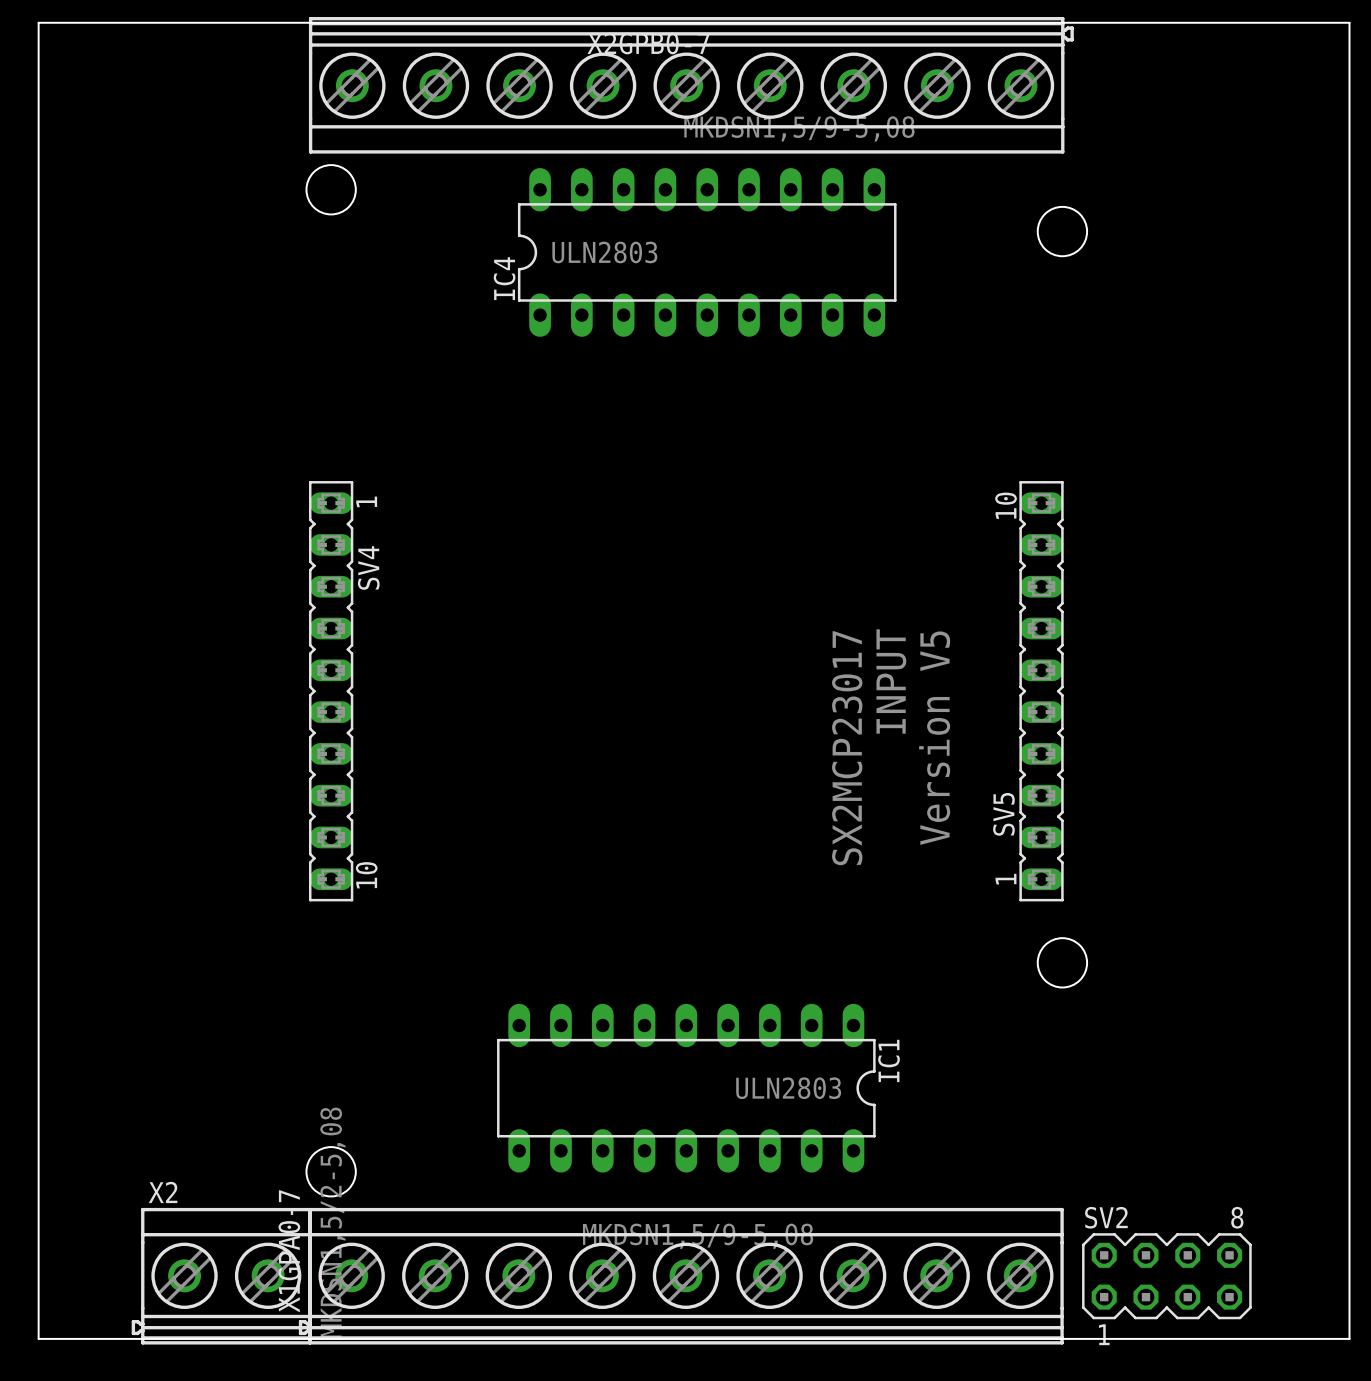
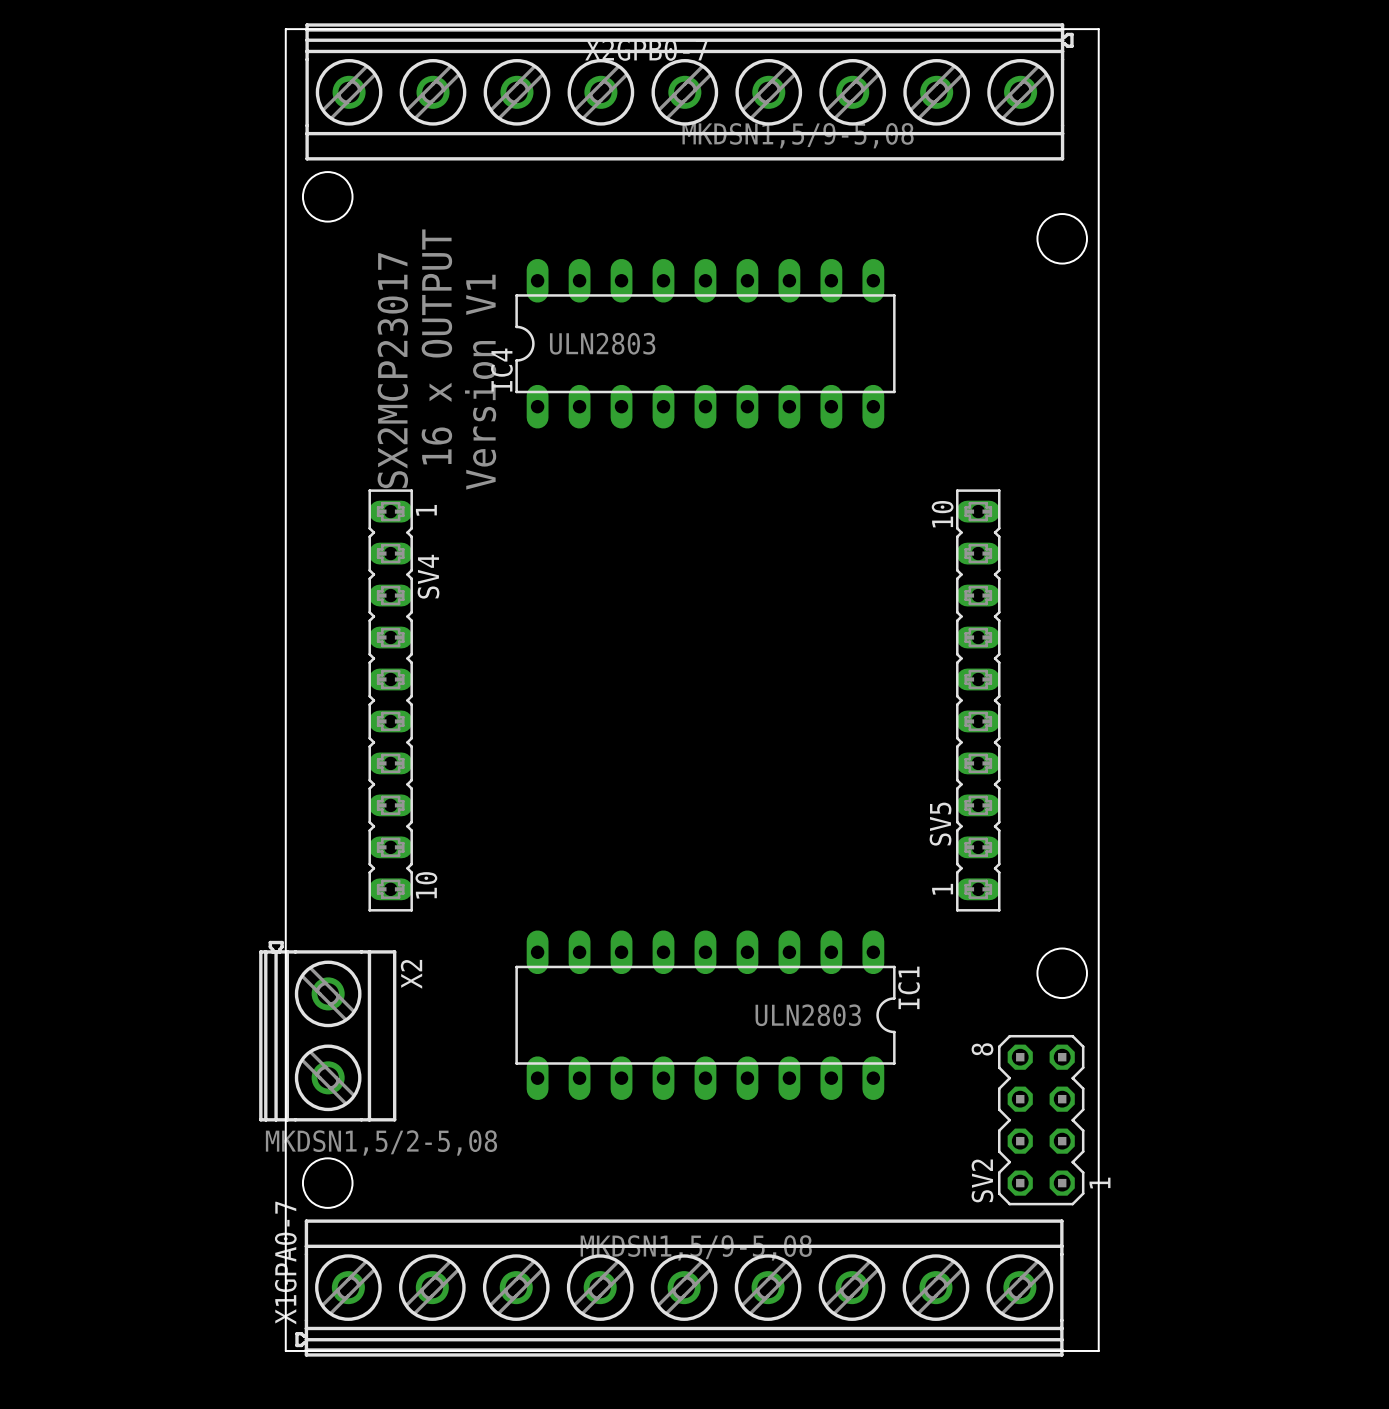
board edge: (289, 22) (38, 22) (38, 1338) (289, 1338) -> (285, 29) (285, 1350)
board edge: (1098, 22) (1349, 22) (1349, 1338) (1098, 1338) -> (1098, 29) (1098, 1350)
IC4 position: (707, 252) -> (705, 343)
text: none -> 16 x OUTPUT (436, 346)
text: none -> SX2MCP23017 (392, 370)
text: none -> Version V1 (480, 382)
text: INPUT (891, 681) -> none
SV4 position: (331, 691) -> (390, 700)
SV5 position: (1041, 691) -> (978, 700)
text: Version V5 (934, 738) -> none
text: SX2MCP23017 (847, 748) -> none
IC1 position: (686, 1088) -> (705, 1015)
X2 rotation: 0° (221, 1276) -> 90° clockwise (327, 1031)
X2 position: (221, 1276) -> (327, 1031)
SV2 rotation: 0° (1166, 1276) -> 90° counterclockwise (1041, 1120)
SV2 position: (1166, 1276) -> (1041, 1120)

